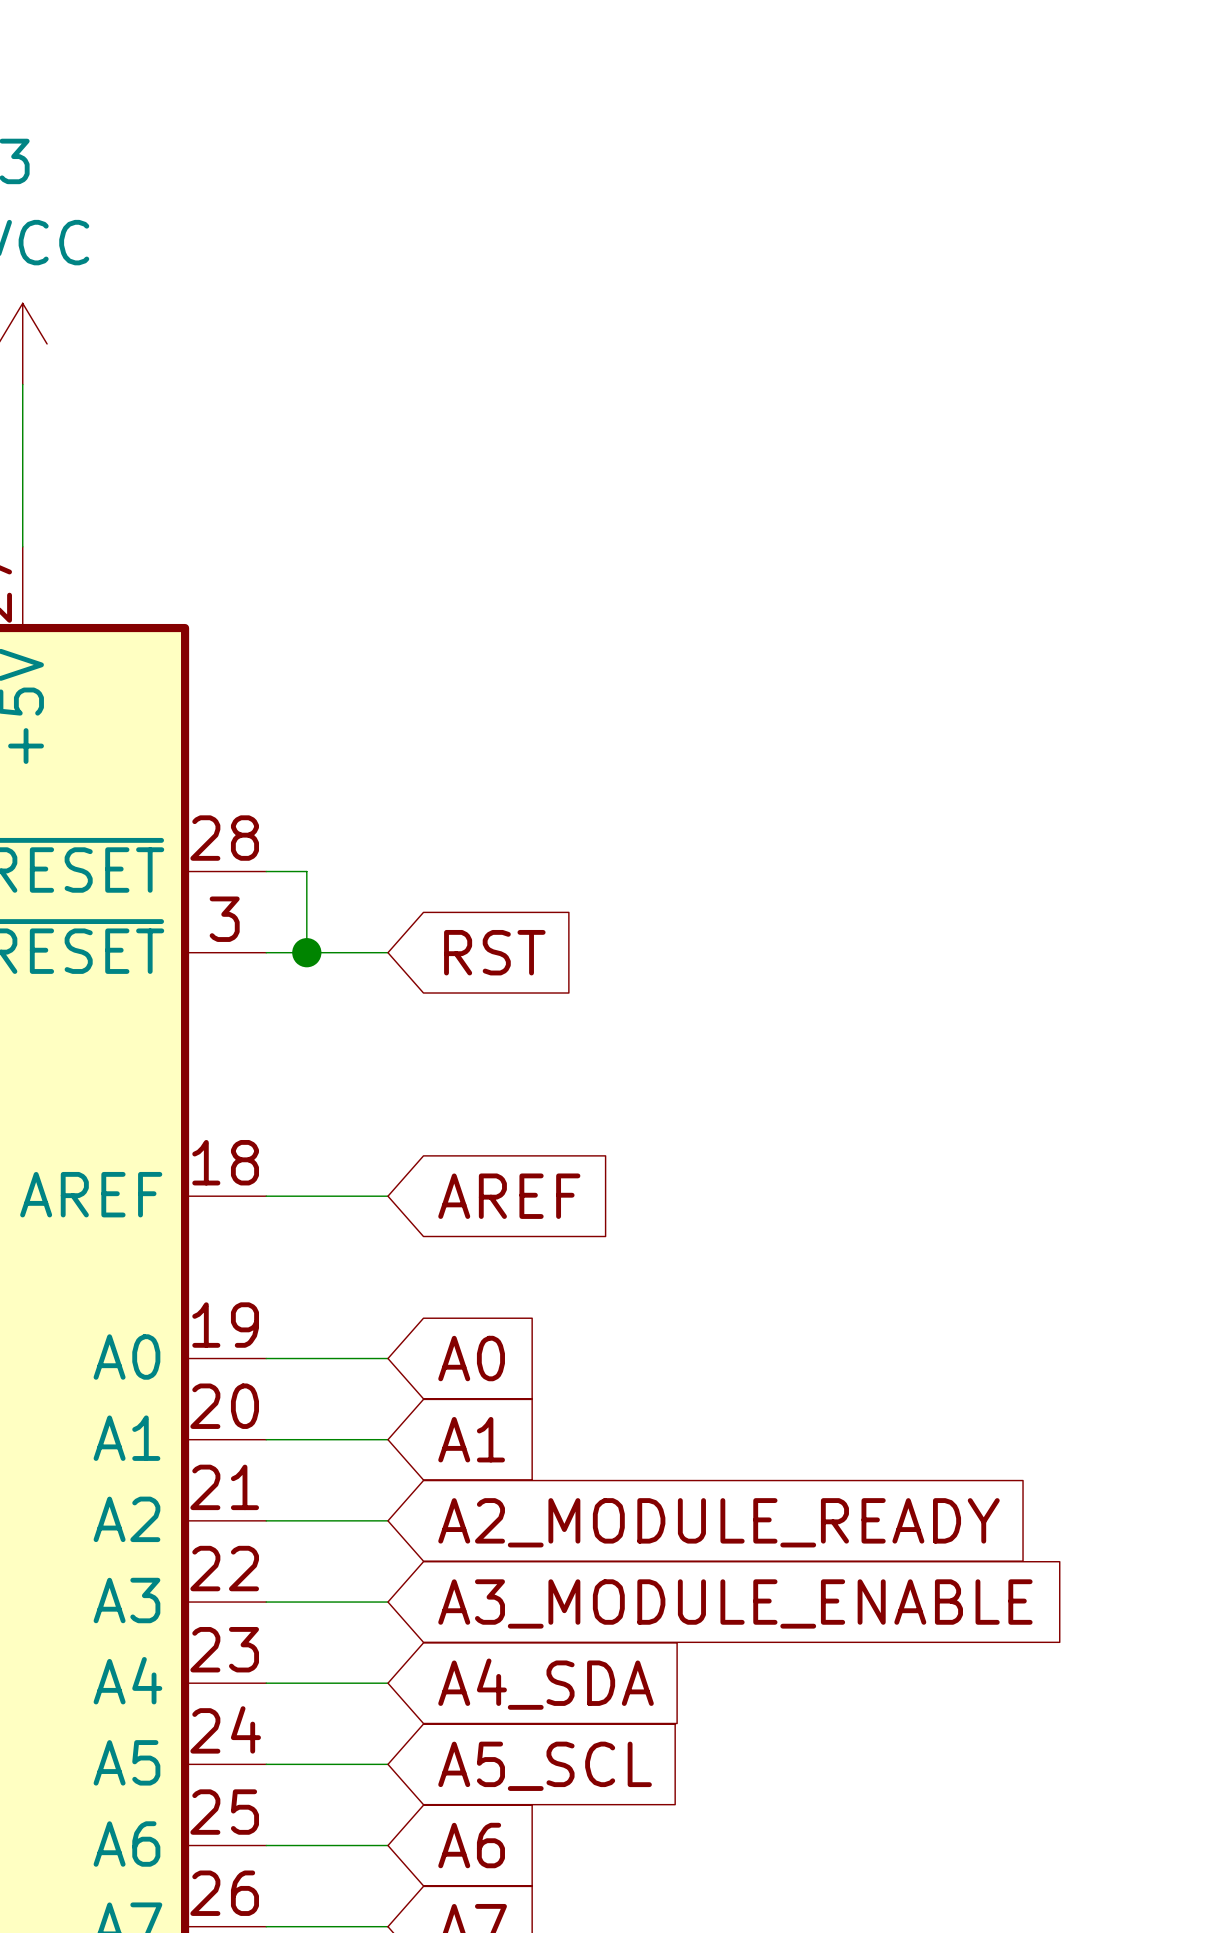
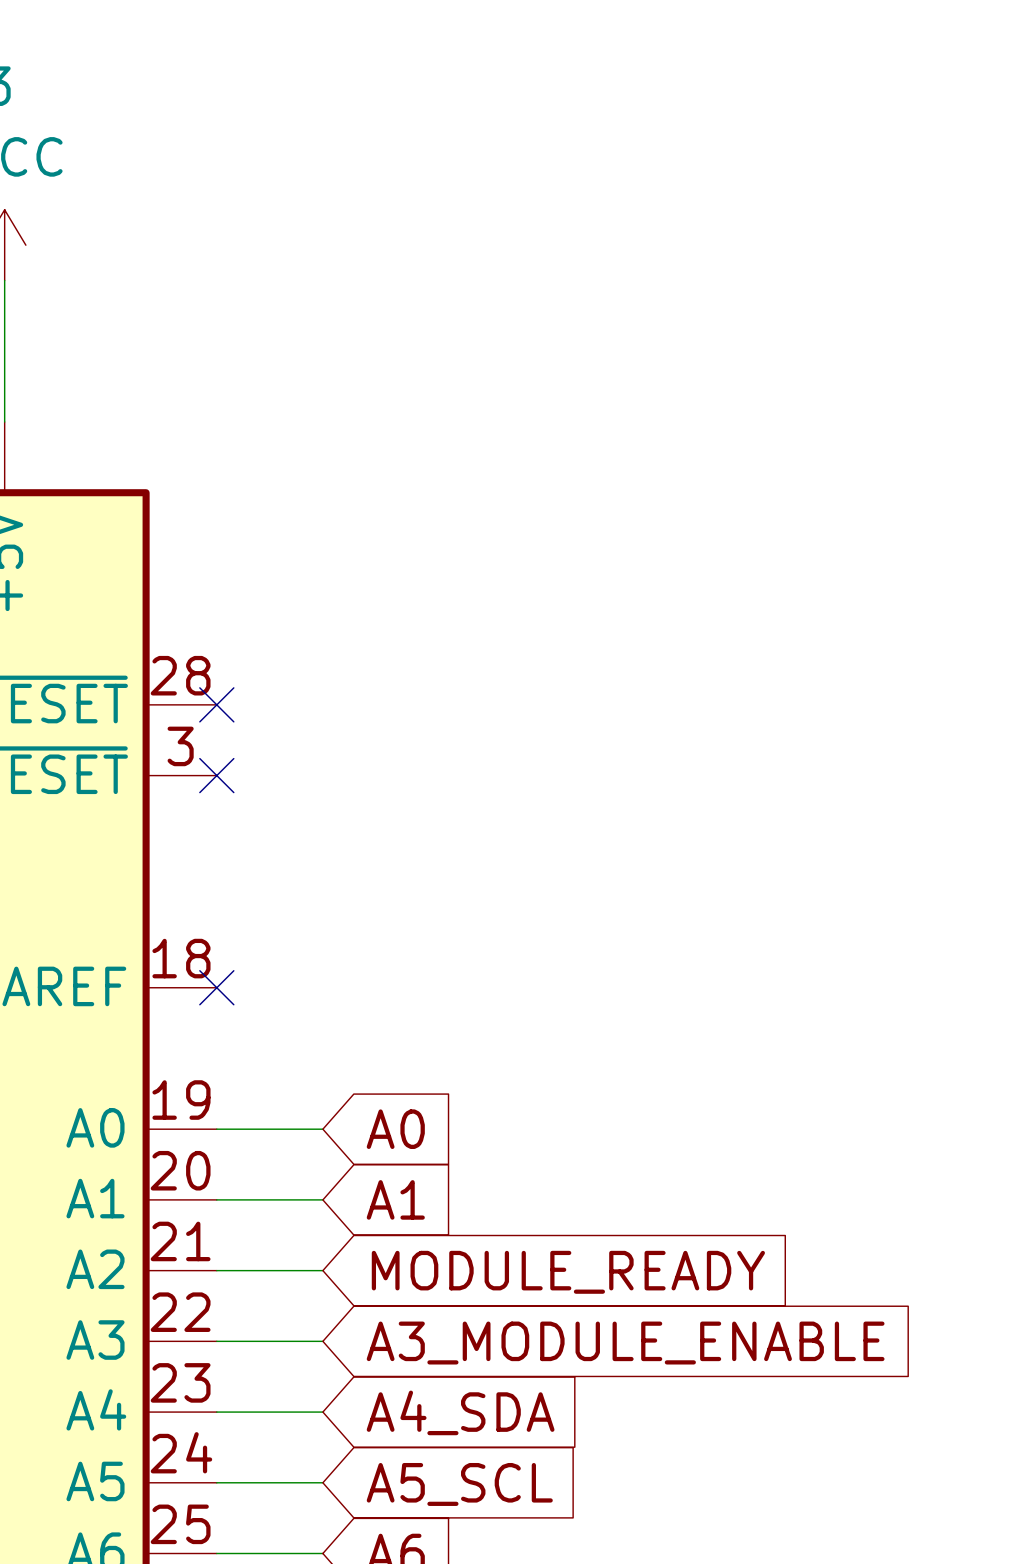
wire: (266, 871) (306, 871) (306, 952) -> none
no-connect mark: none -> (216, 704)
wire: (266, 952) (387, 952) -> none
no-connect mark: none -> (216, 775)
junction: (306, 952) -> none
global label: RST (494, 952) -> none
wire: (266, 1196) (387, 1196) -> none
no-connect mark: none -> (216, 987)
global label: AREF (509, 1196) -> none
global label: A2_MODULE_READY (718, 1522) -> MODULE_READY (568, 1272)

